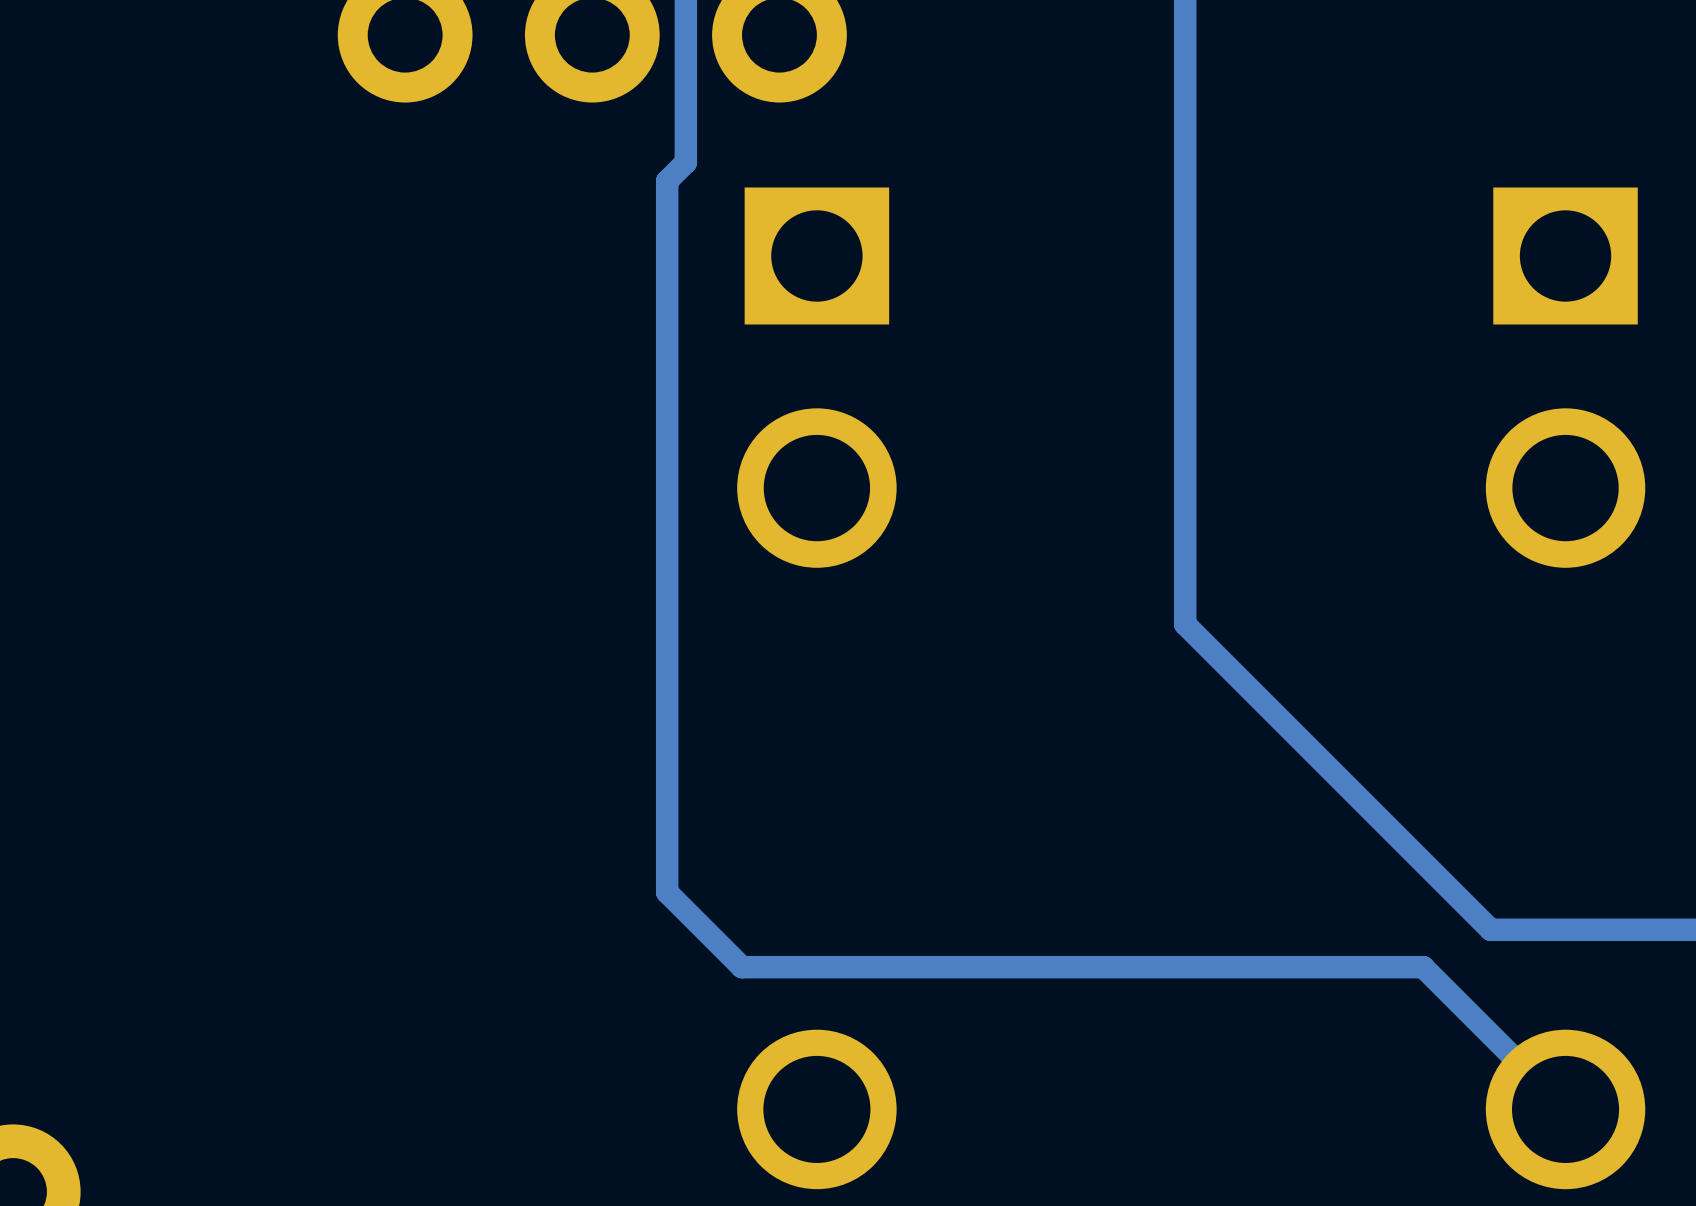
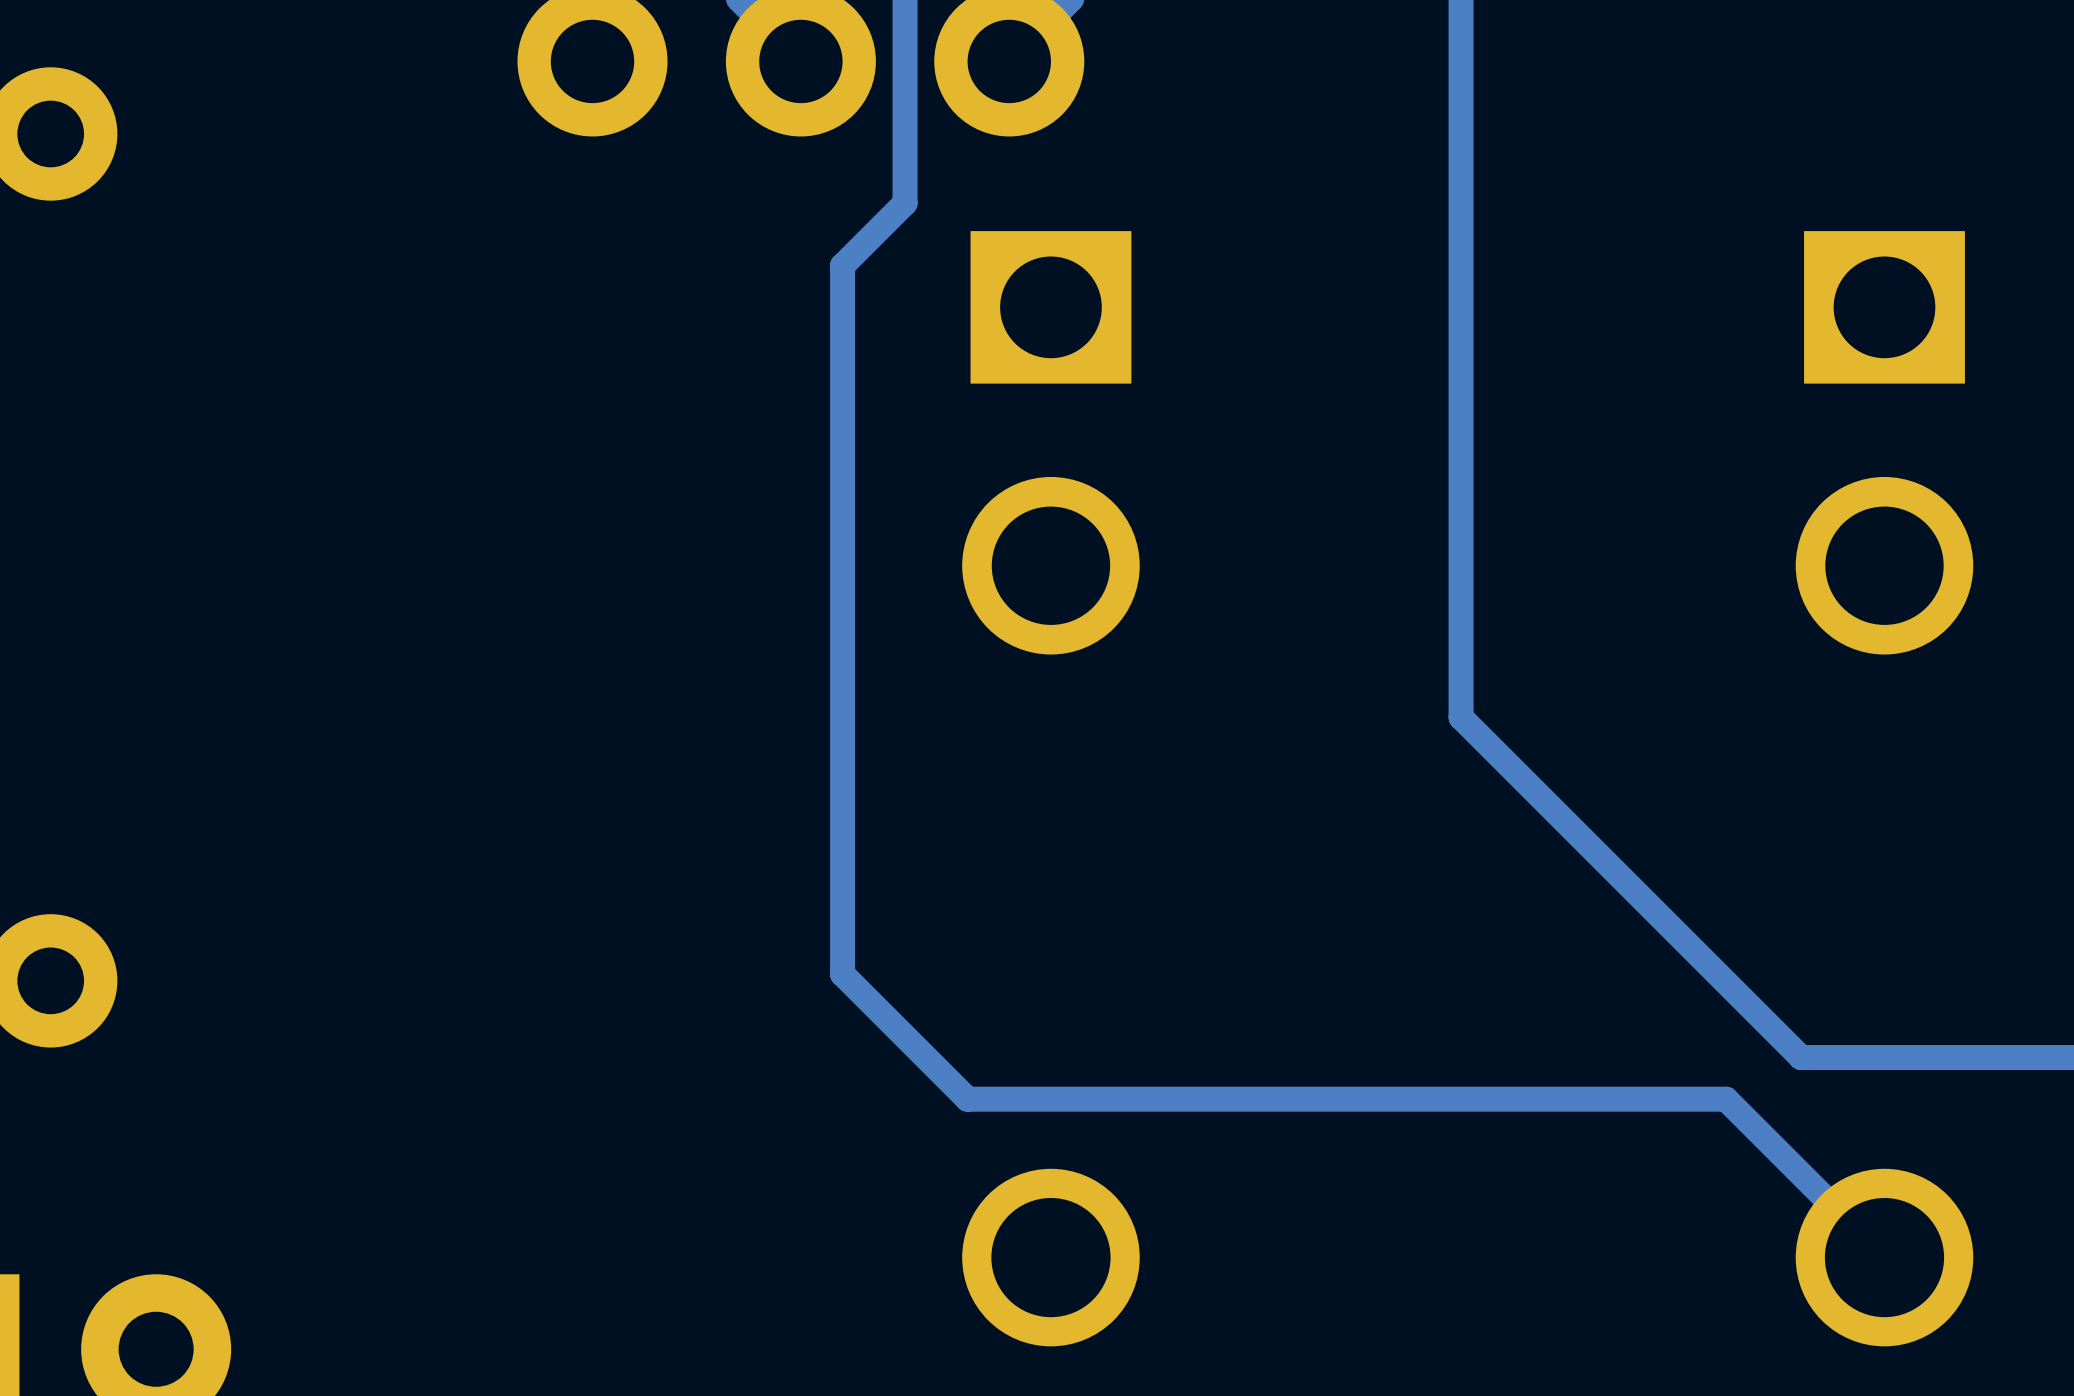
track: (667, 181) (667, 892) -> (884, 223) (842, 265) (842, 974) (884, 1015)

